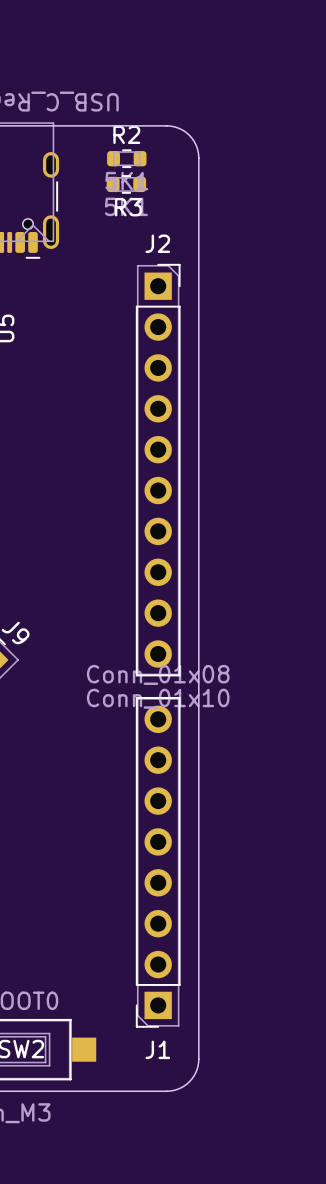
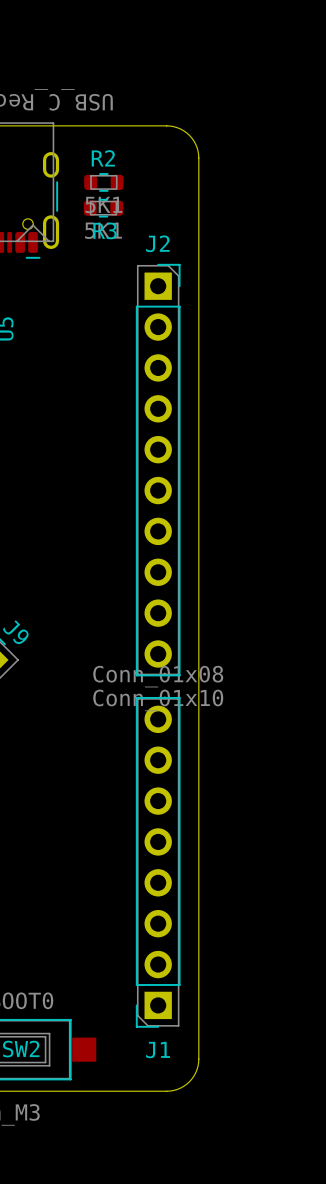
R2 position: (126, 158) -> (103, 182)
R3 position: (126, 184) -> (103, 208)

